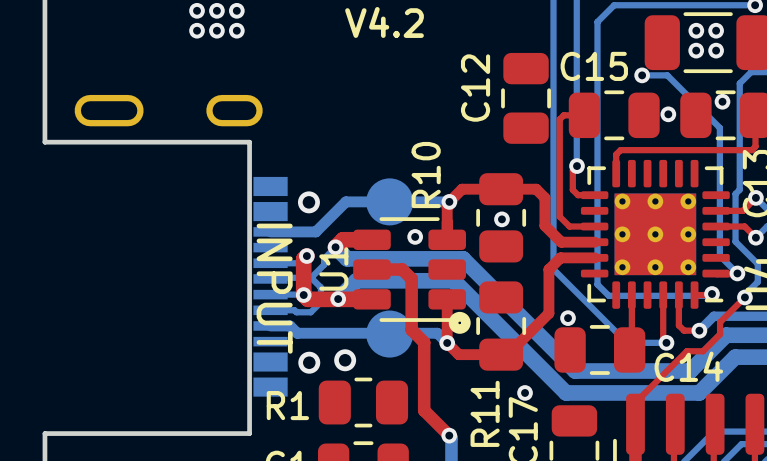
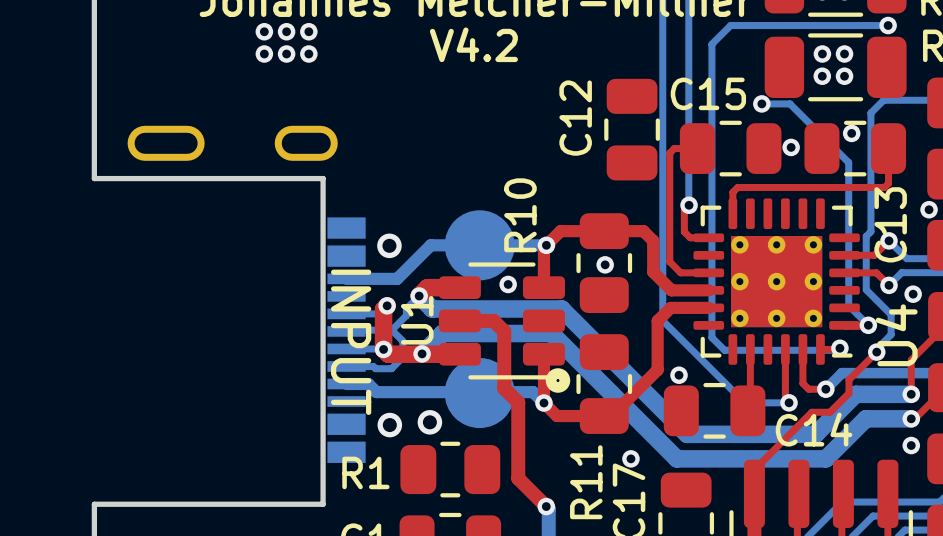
part footprint: [366, 178, 414, 226] -> [444, 210, 515, 281]
part footprint: [366, 310, 414, 358] -> [444, 357, 515, 429]

